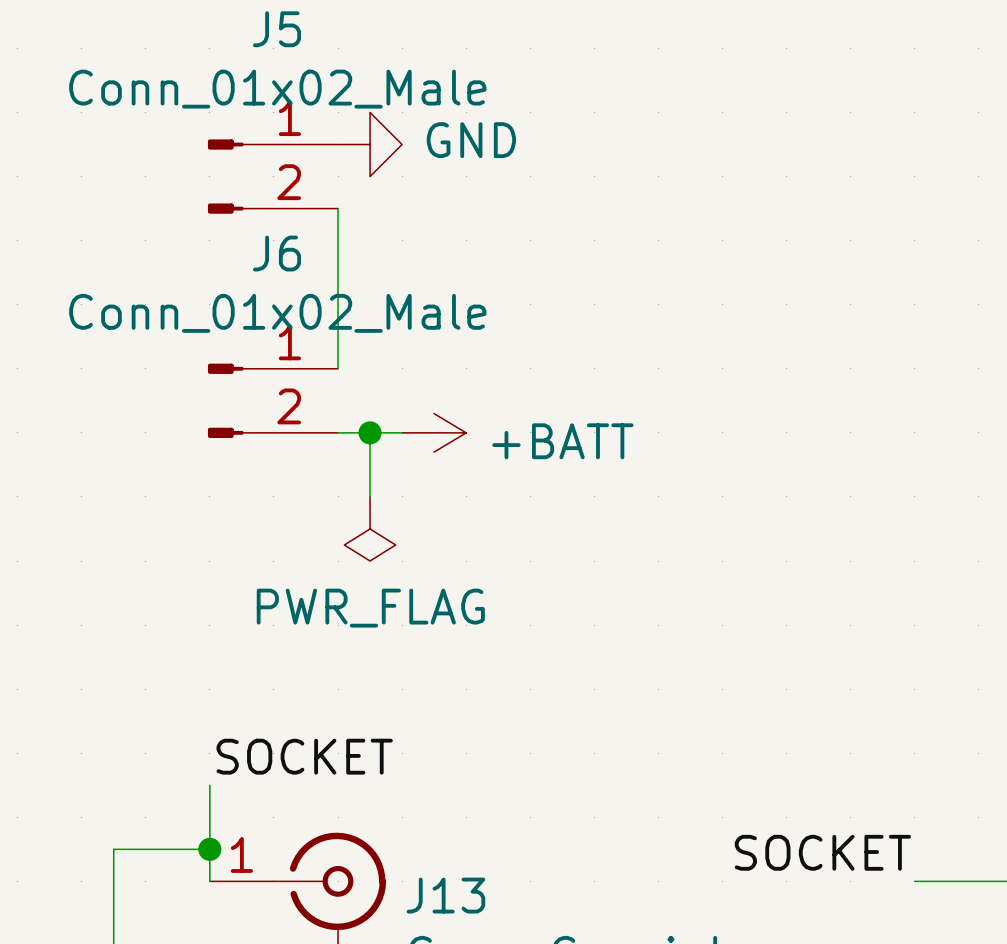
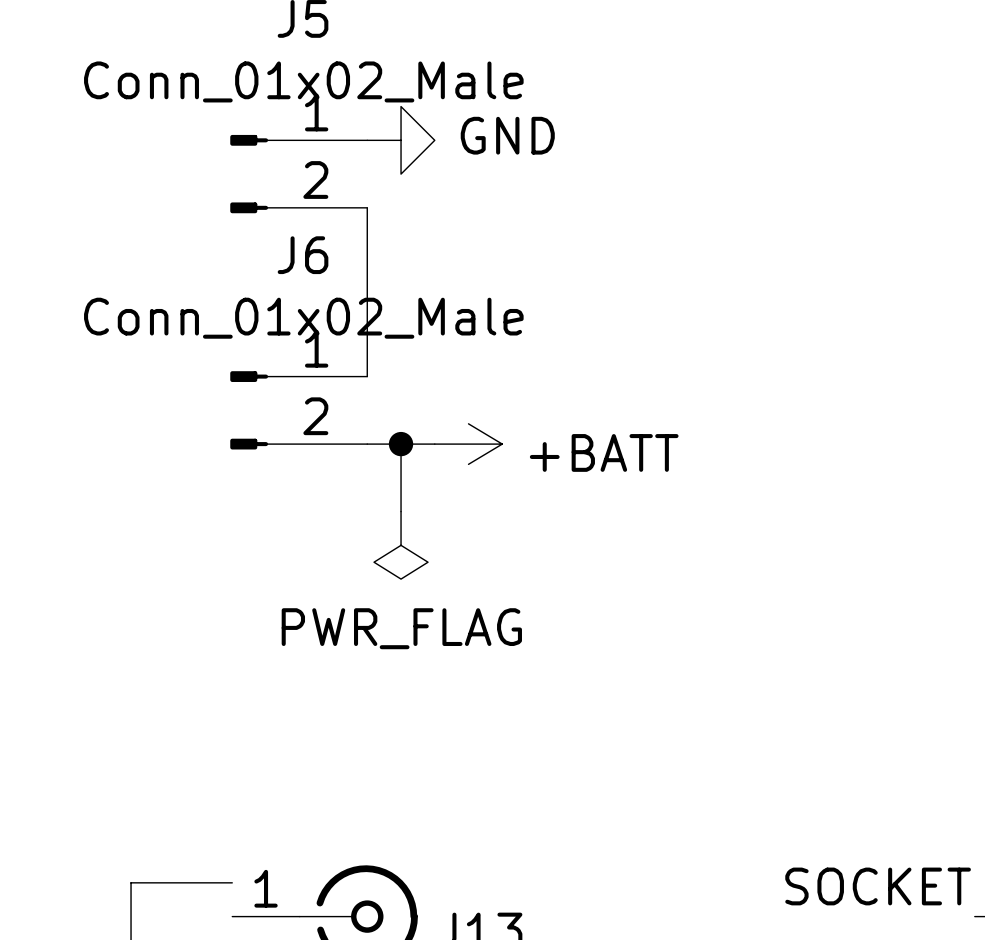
label: SOCKET (304, 756) -> none
wire: (209, 785) (209, 881) -> none
junction: (209, 849) -> none

